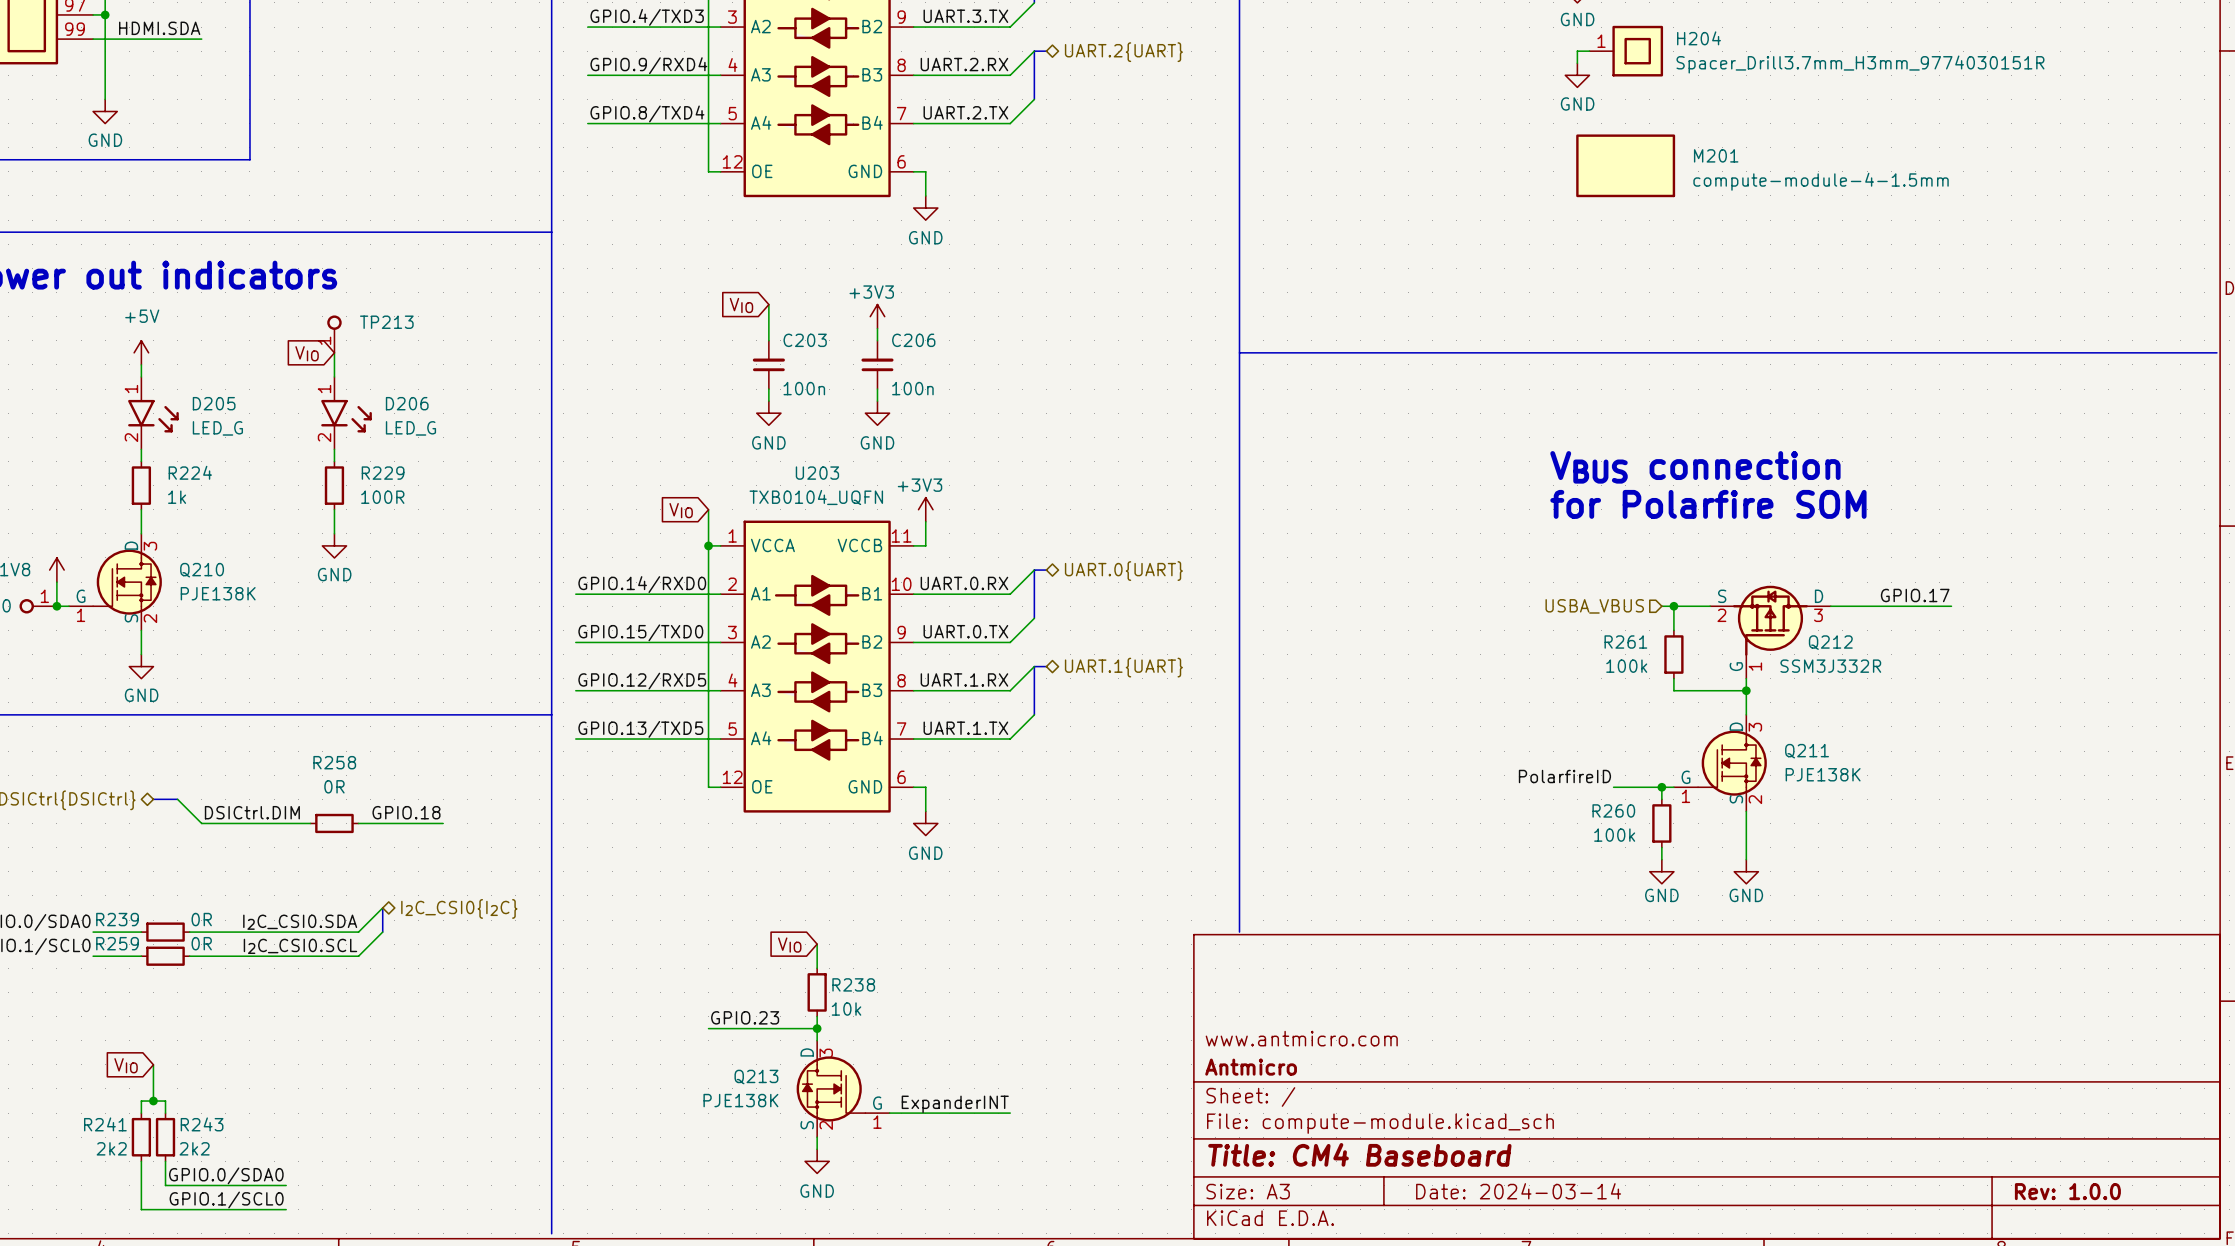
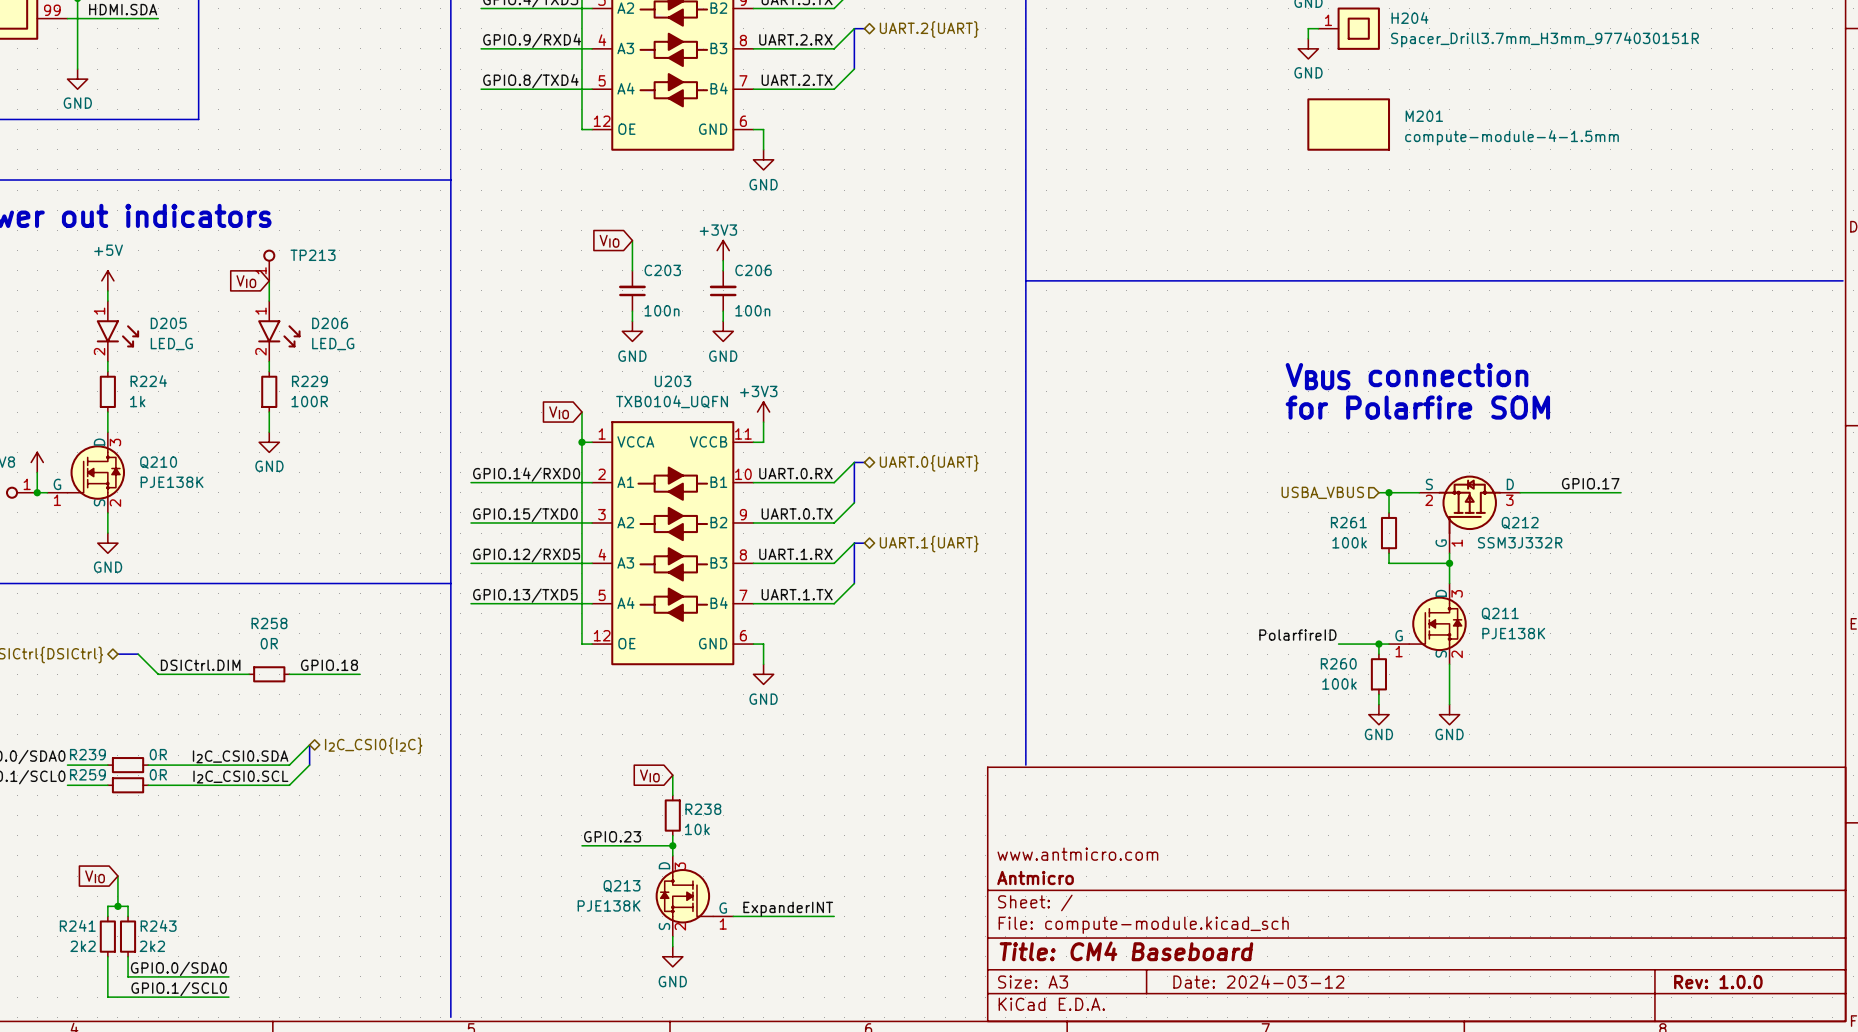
title block: Date: 2024-03-14 (1518, 1191) -> Date: 2024-03-12 (1258, 981)

